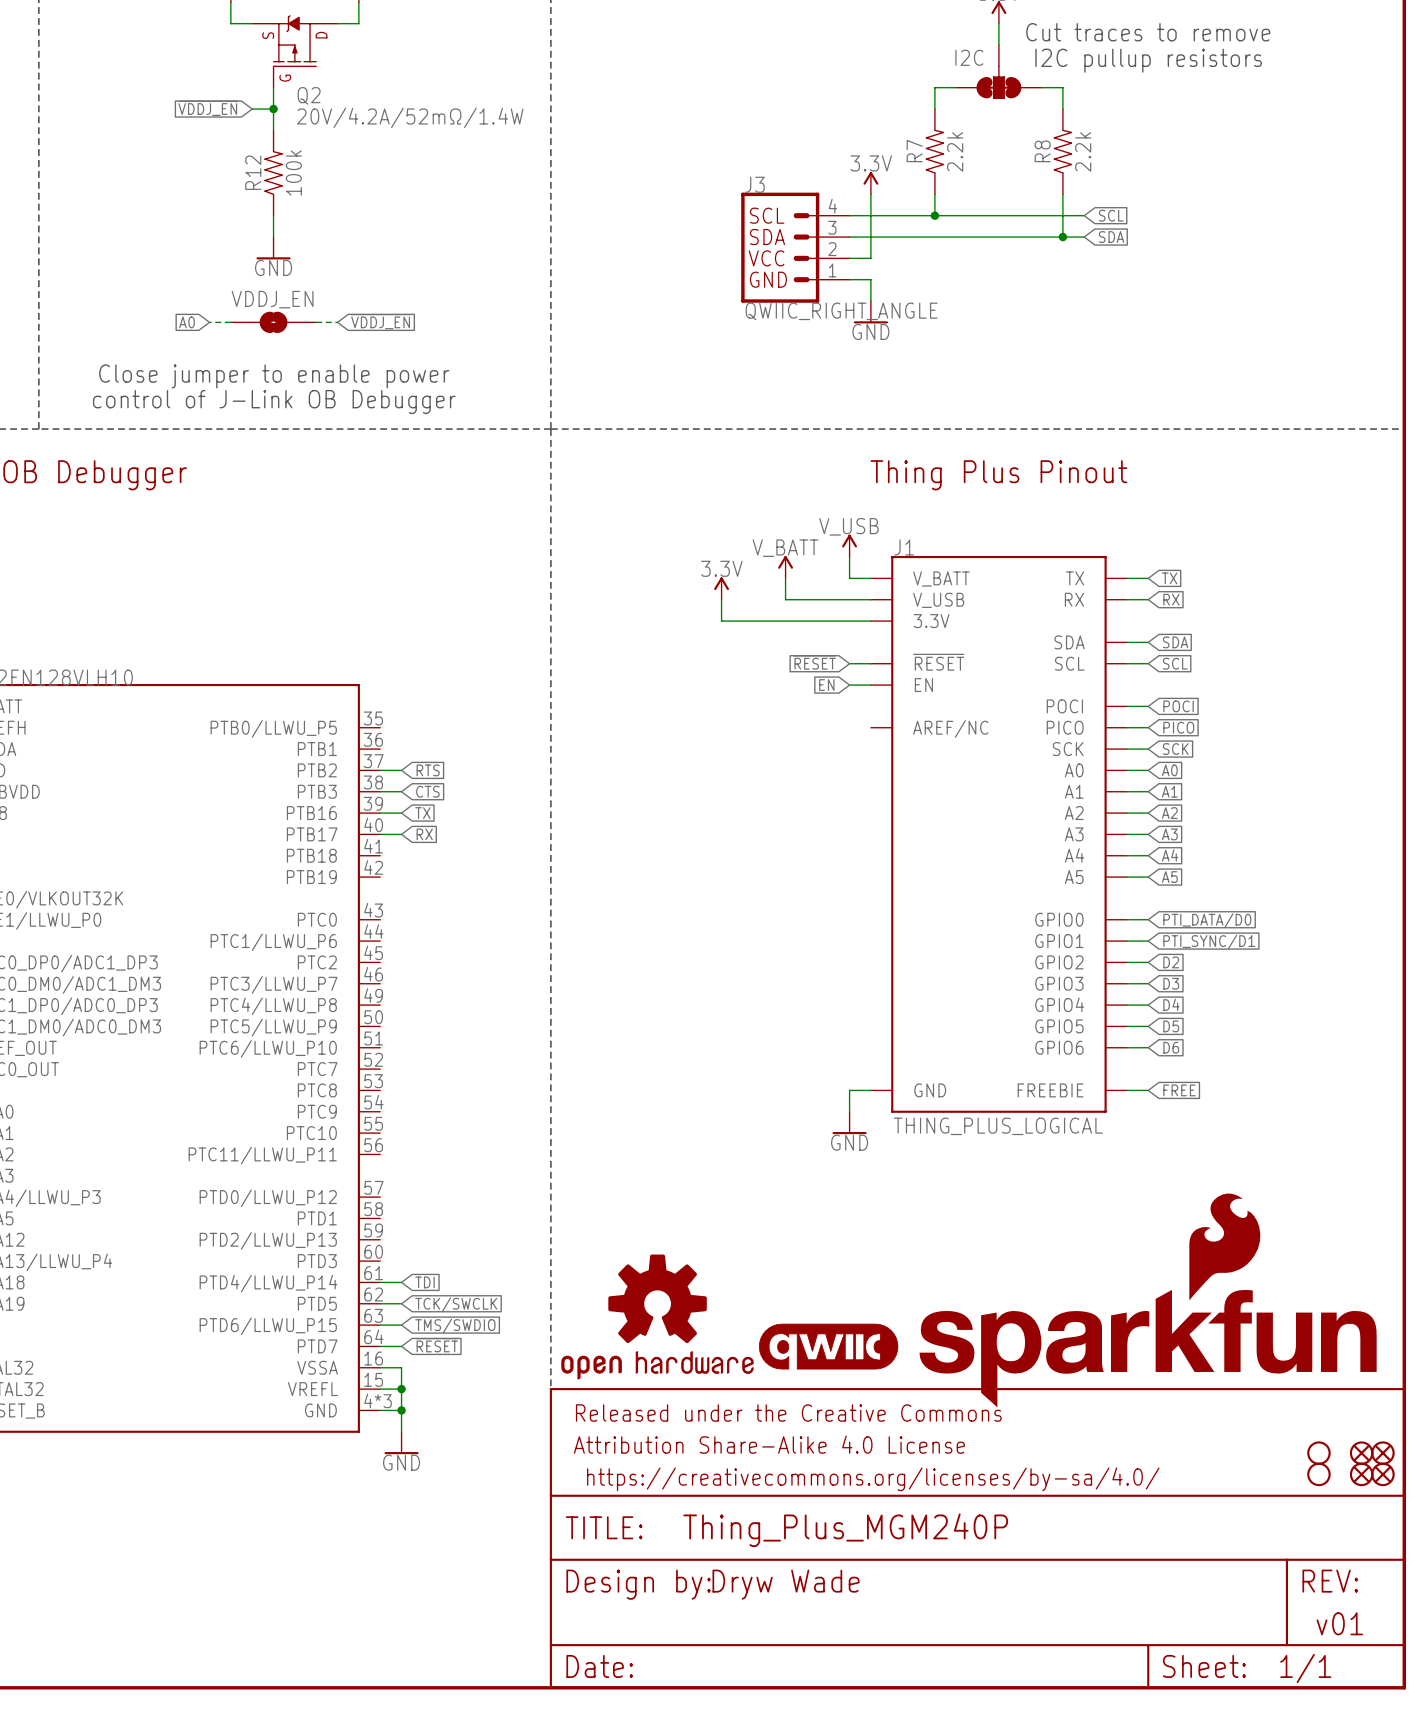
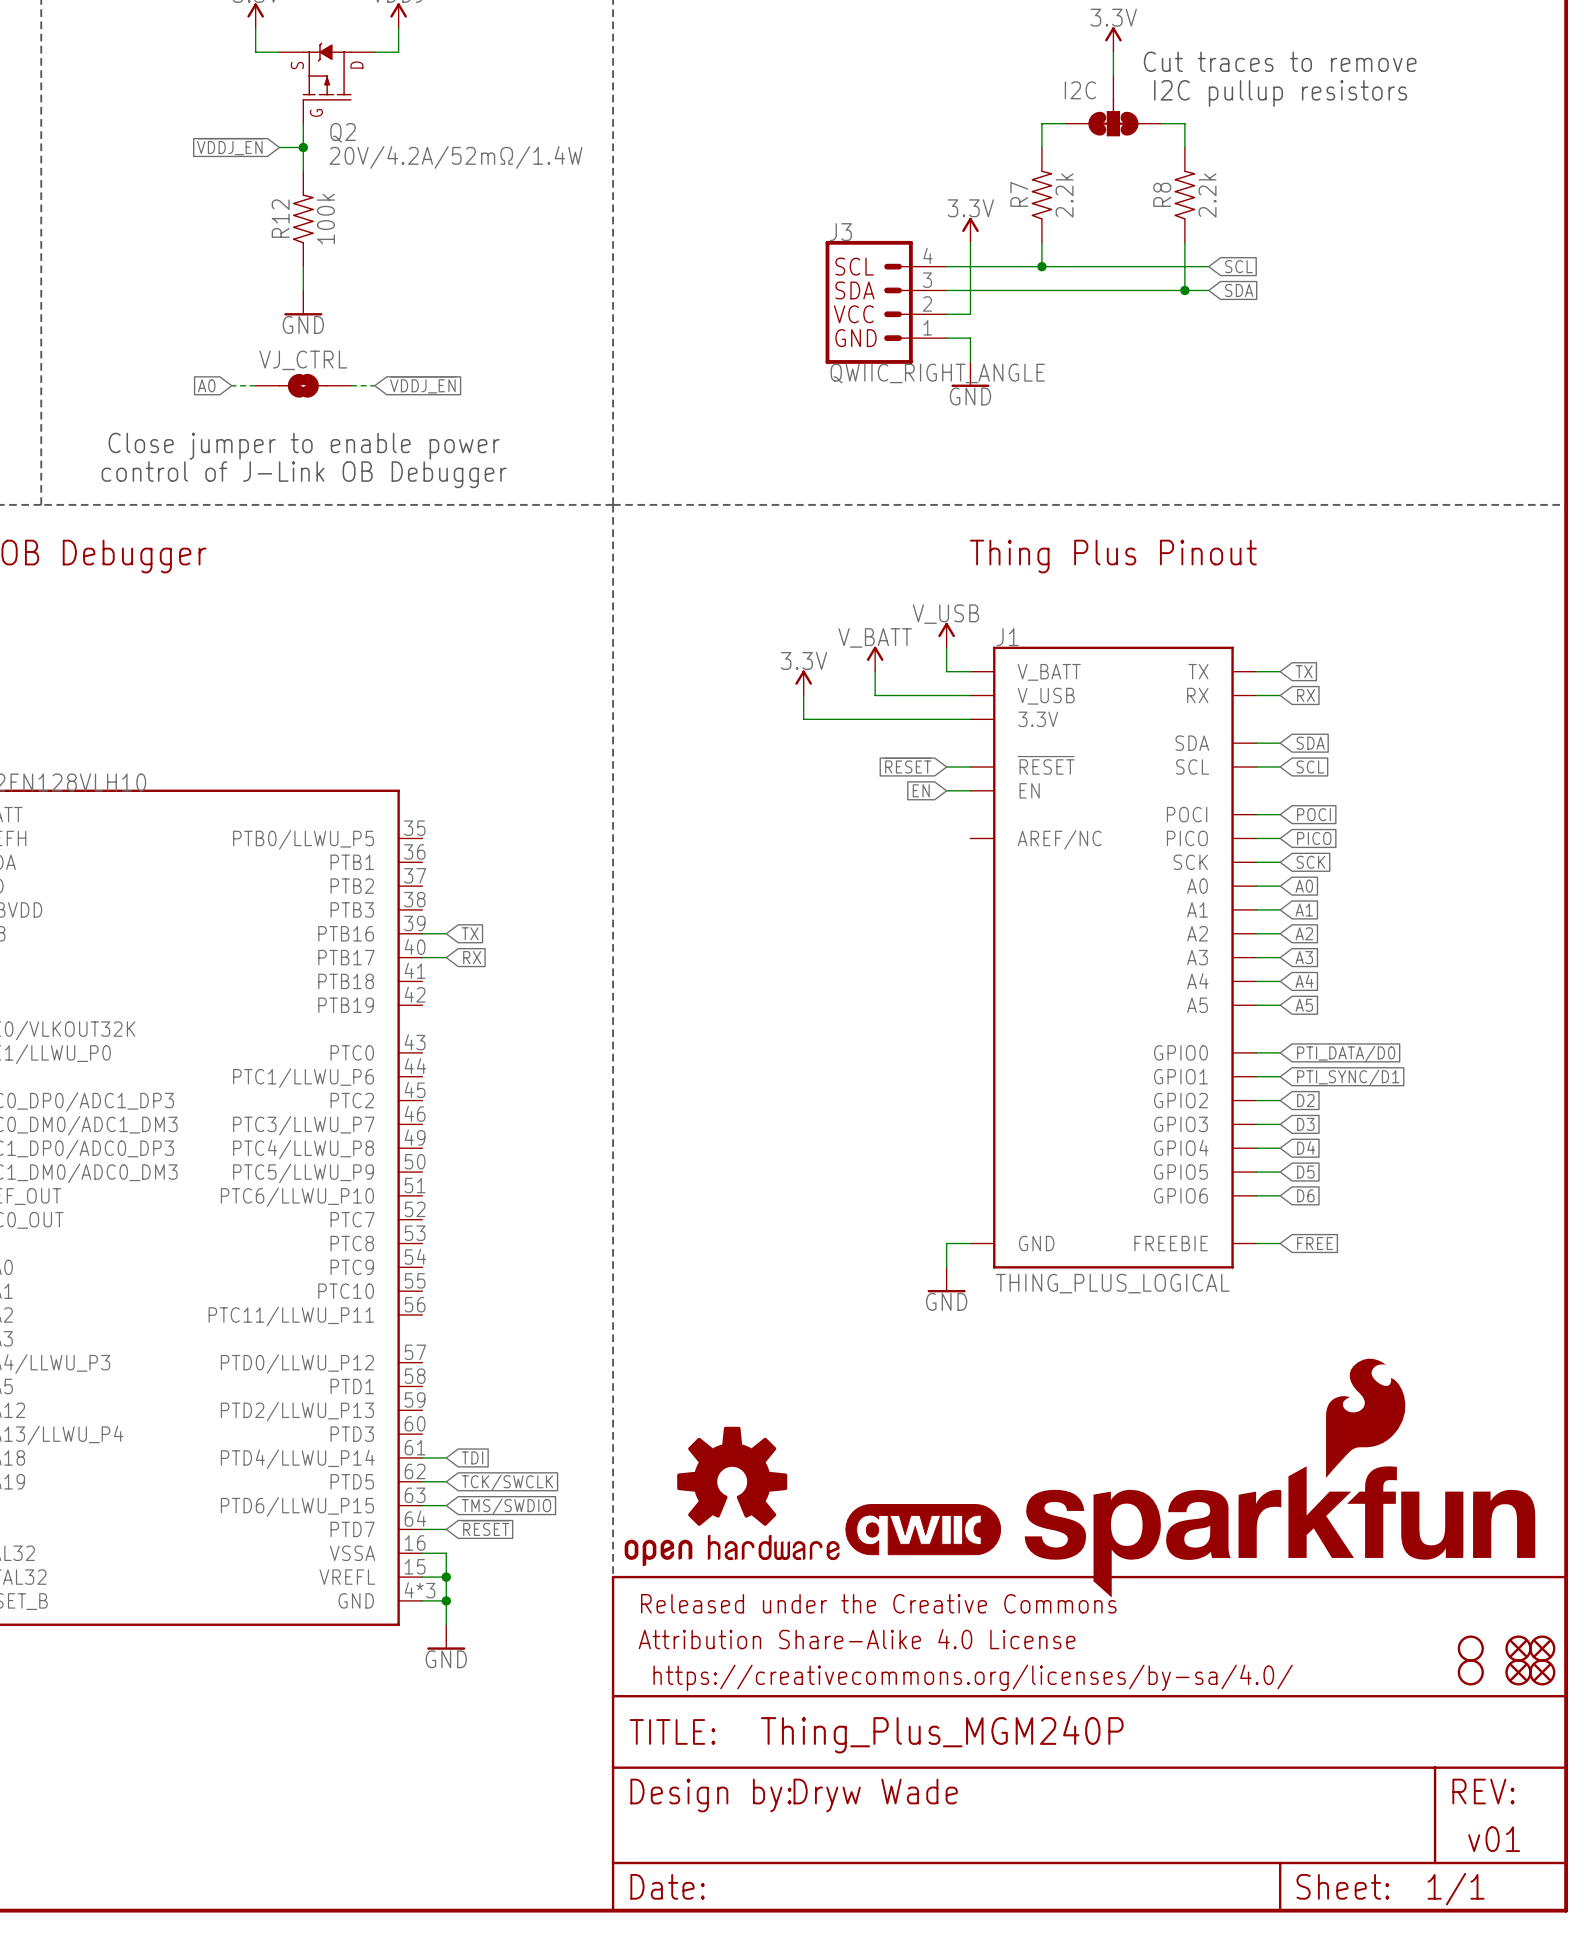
VDDJ_EN name: VDDJ_EN (272, 299) -> VJ_CTRL (303, 360)
wire: (380, 770) (401, 770) -> none
global label: RTS (428, 770) -> none
wire: (380, 791) (401, 791) -> none
global label: CTS (427, 791) -> none

